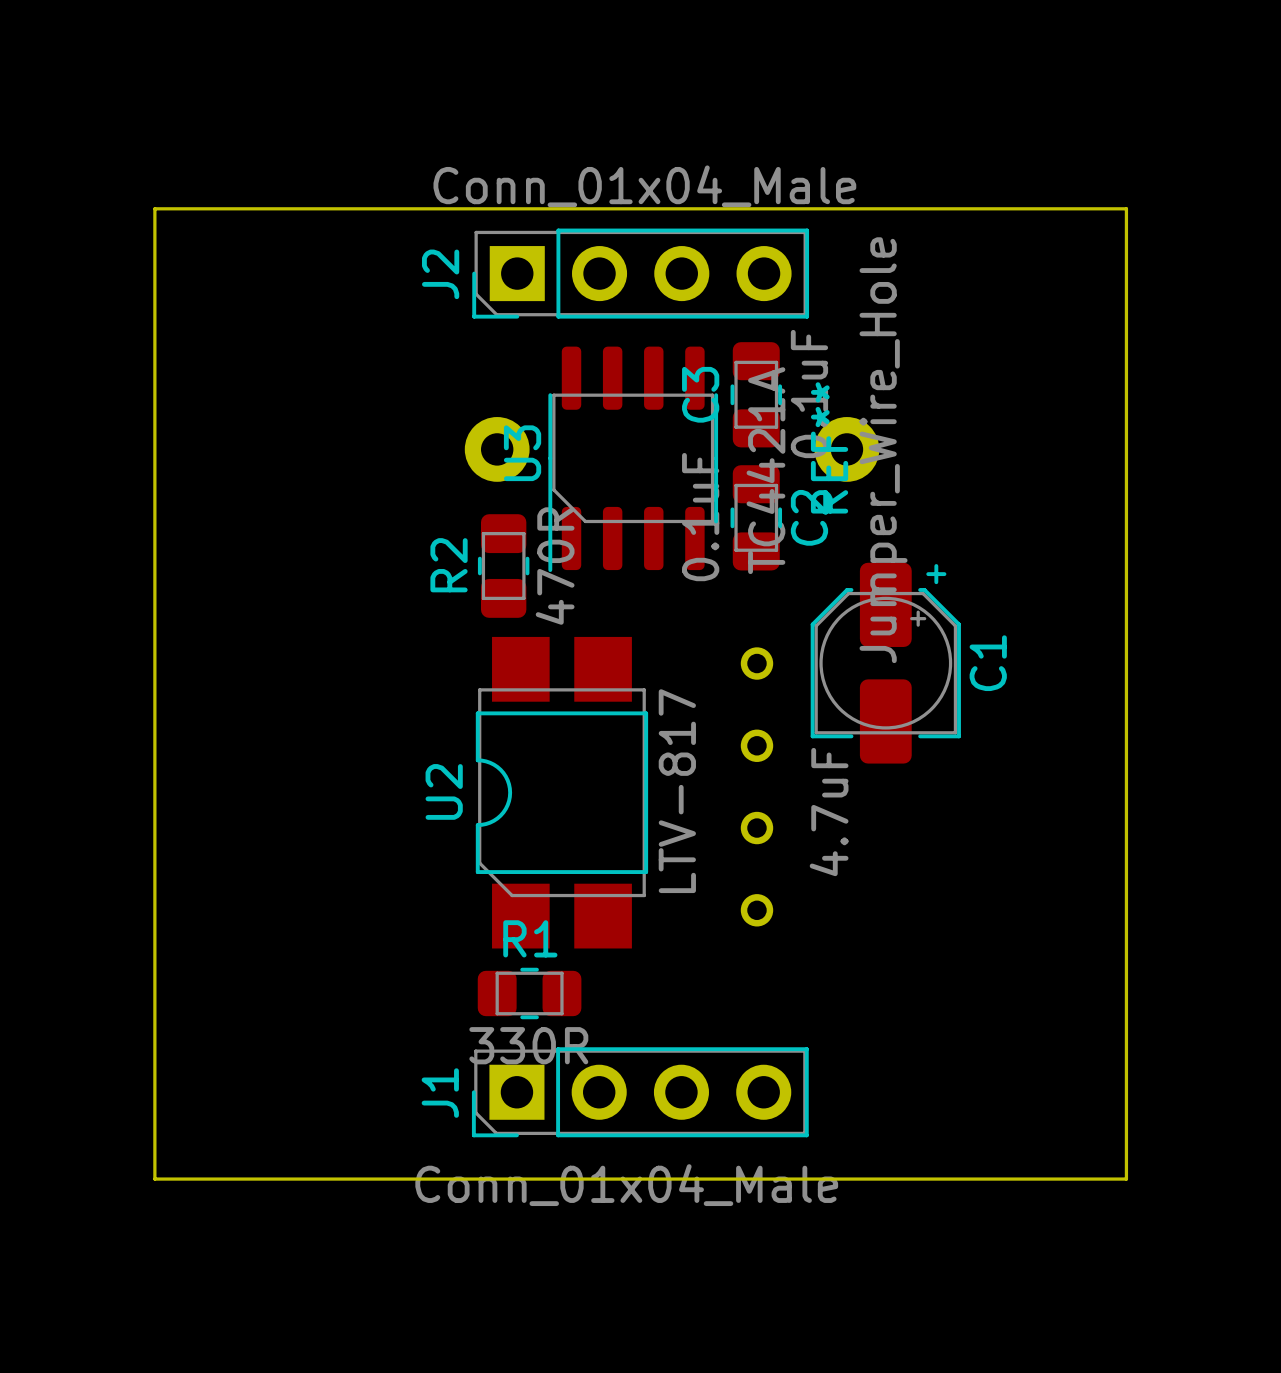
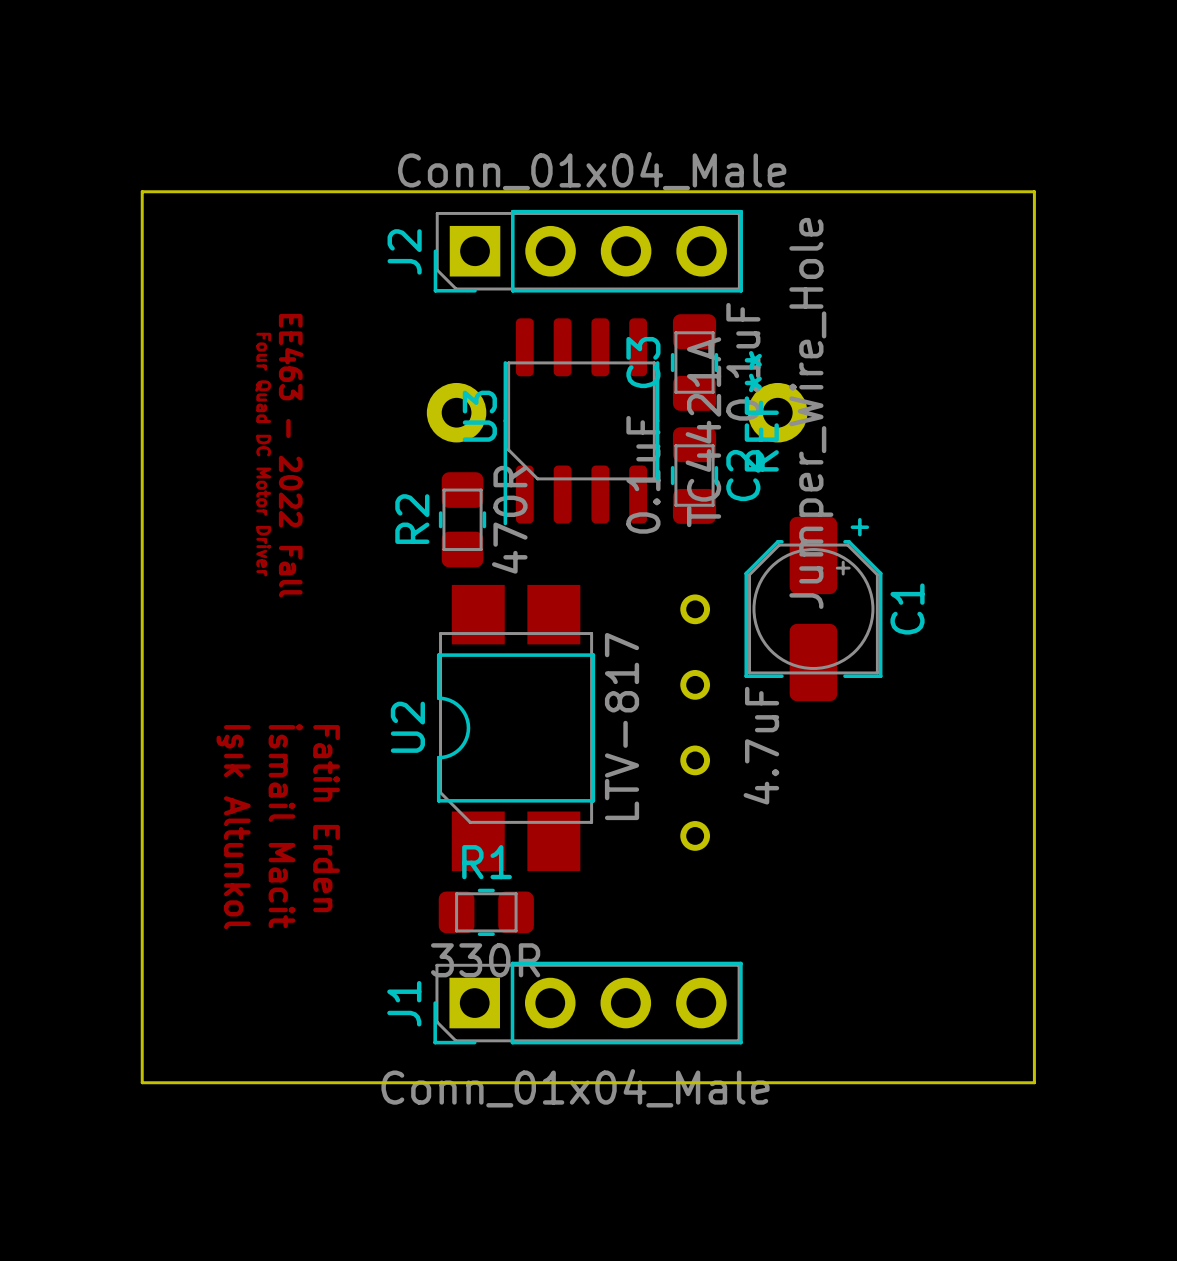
text: none -> Four Quad DC Motor Driver (263, 454)
text: none -> EE463 - 2022 Fall (291, 455)
text: none -> Fatih Erden (326, 818)
text: none -> İsmail Macit (285, 826)
text: none -> Işık Altunkol (233, 827)

